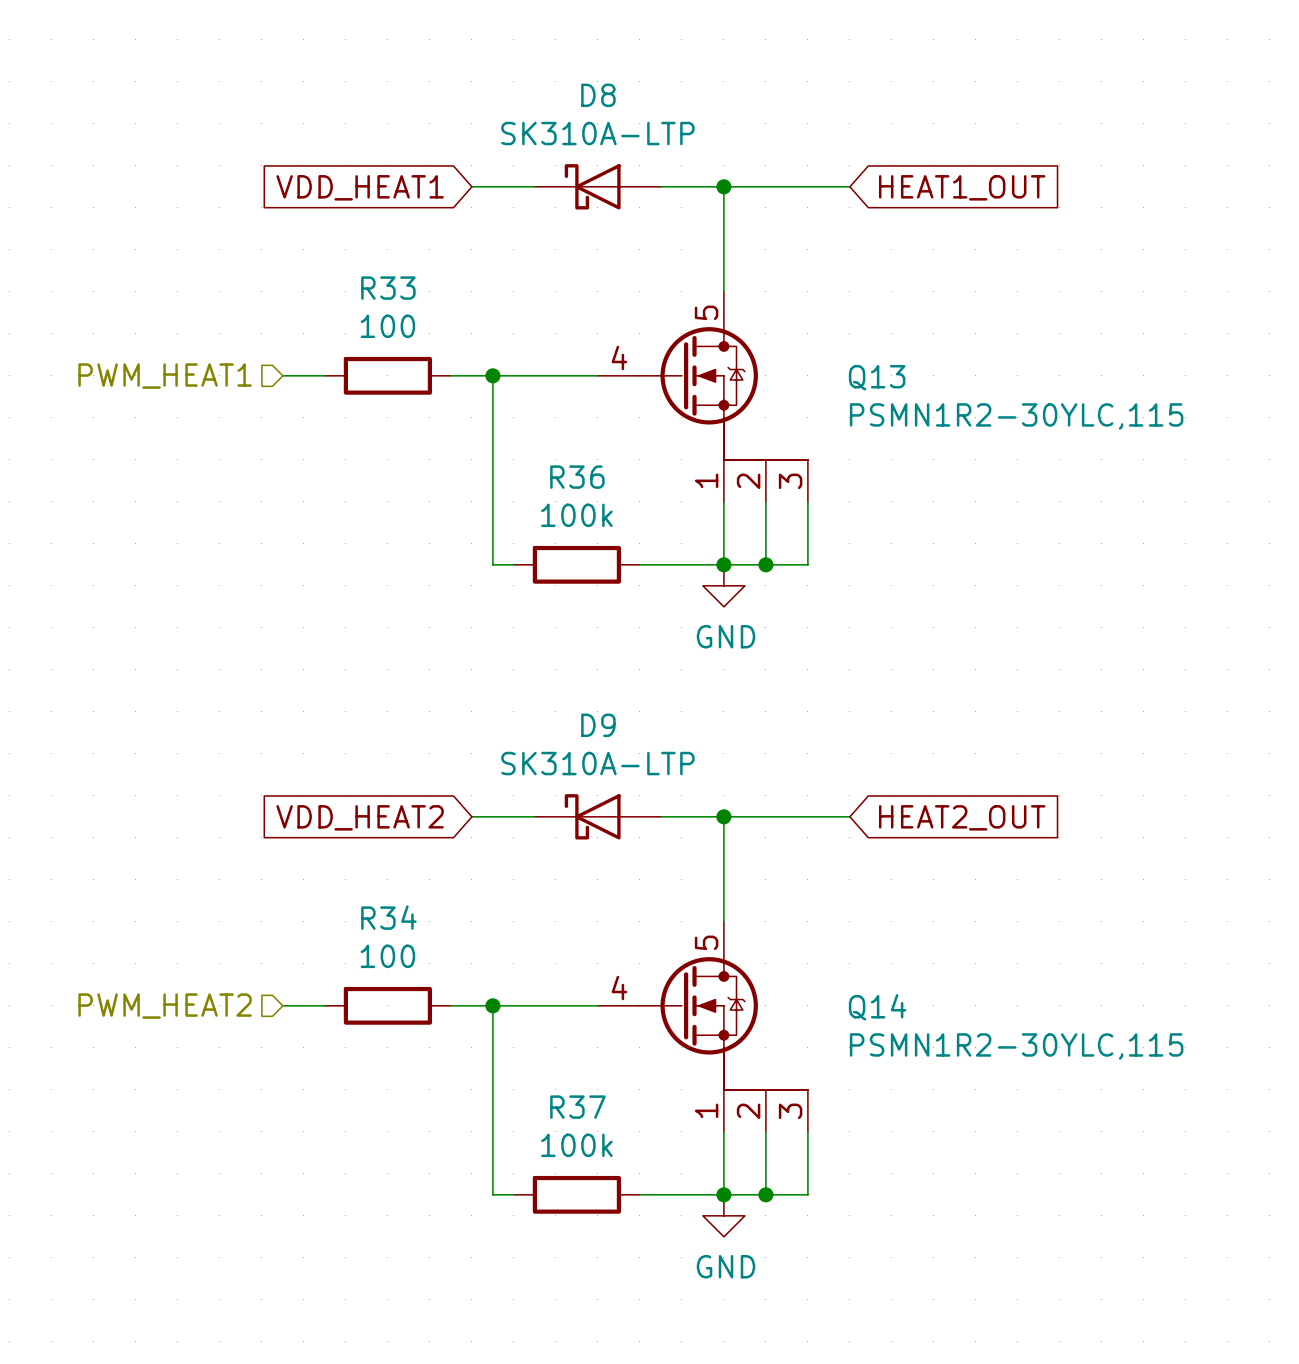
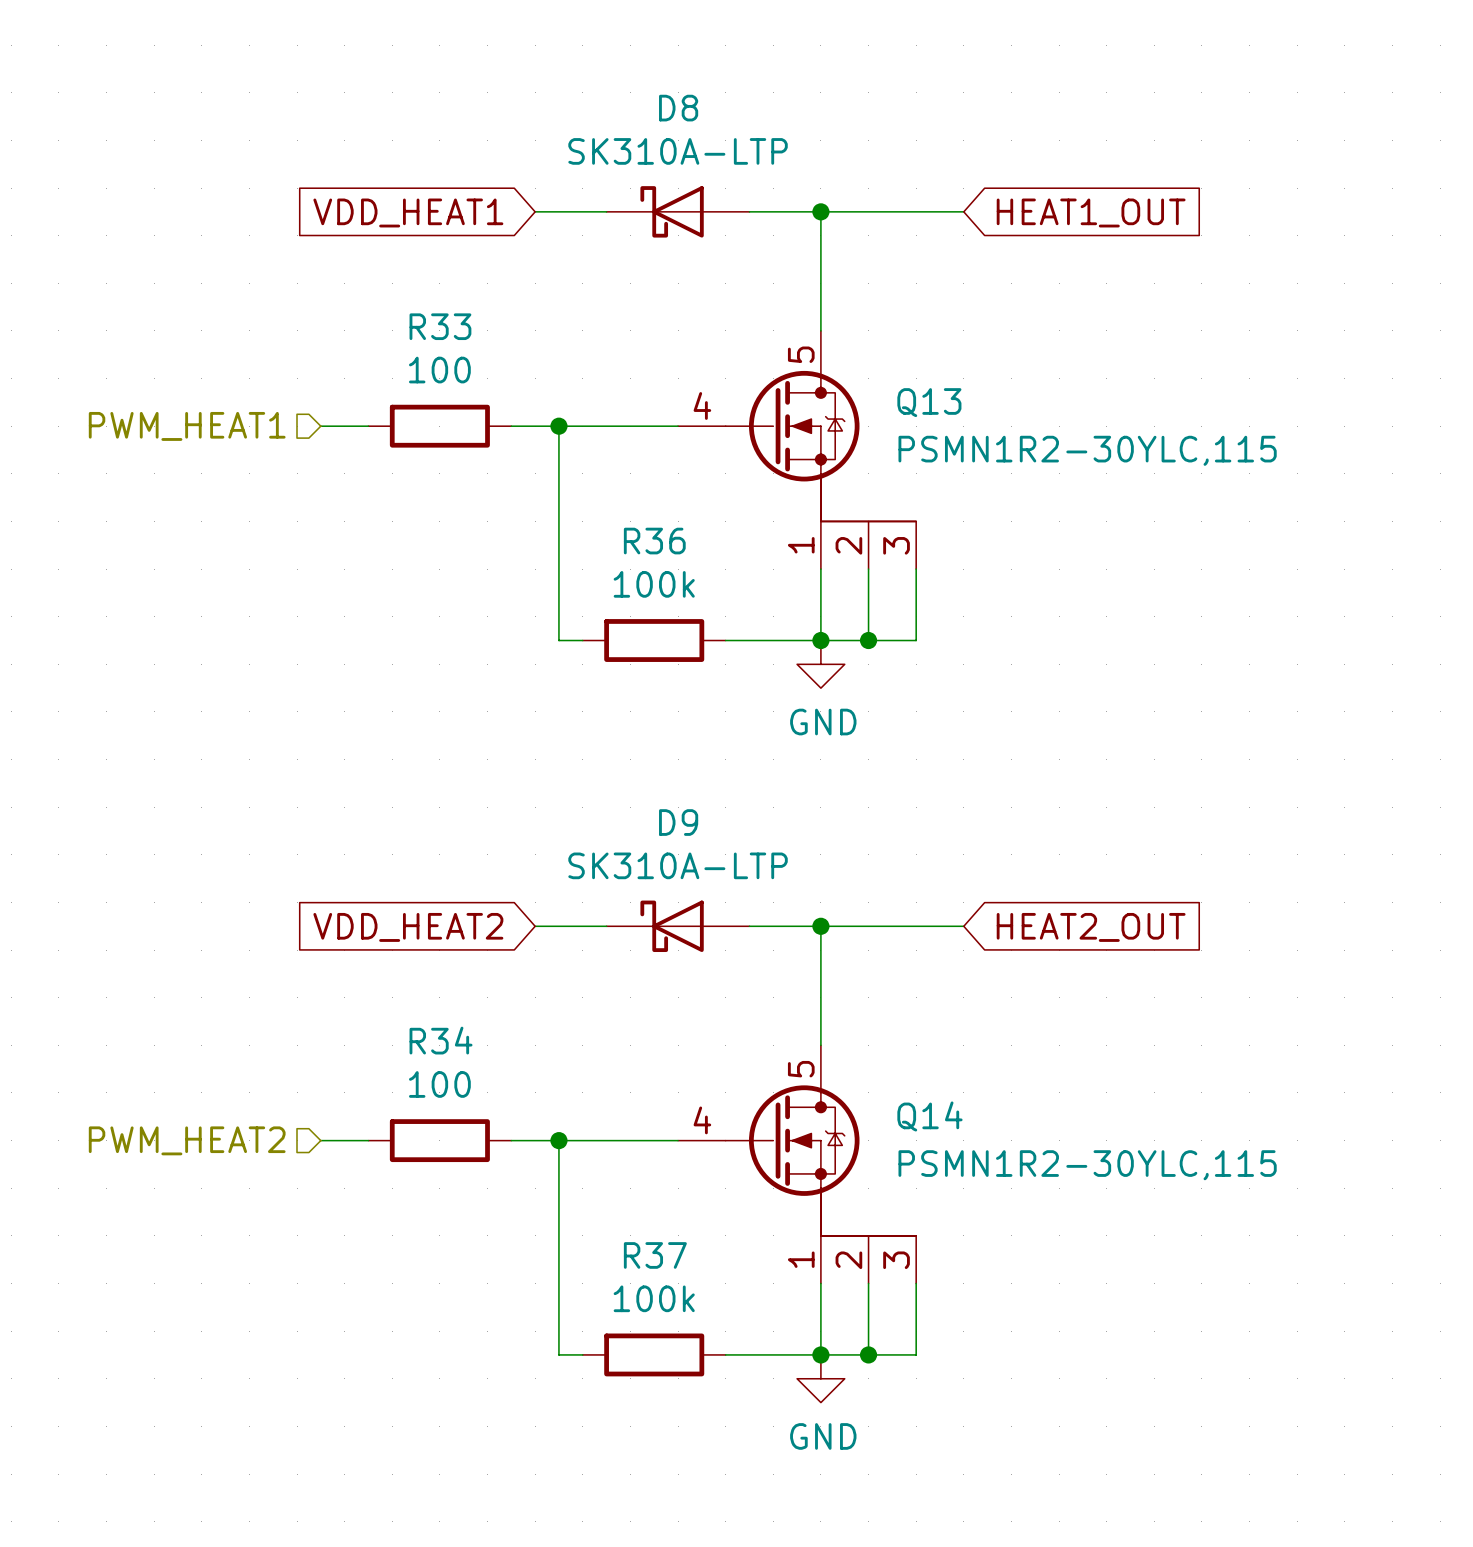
Q13 name position: Q13 (877, 377) -> Q13 (929, 402)
Q13 value position: PSMN1R2-30YLC,115 (1016, 416) -> PSMN1R2-30YLC,115 (1087, 450)
Q14 name position: Q14 (877, 1007) -> Q14 (929, 1116)
Q14 value position: PSMN1R2-30YLC,115 (1016, 1046) -> PSMN1R2-30YLC,115 (1087, 1165)

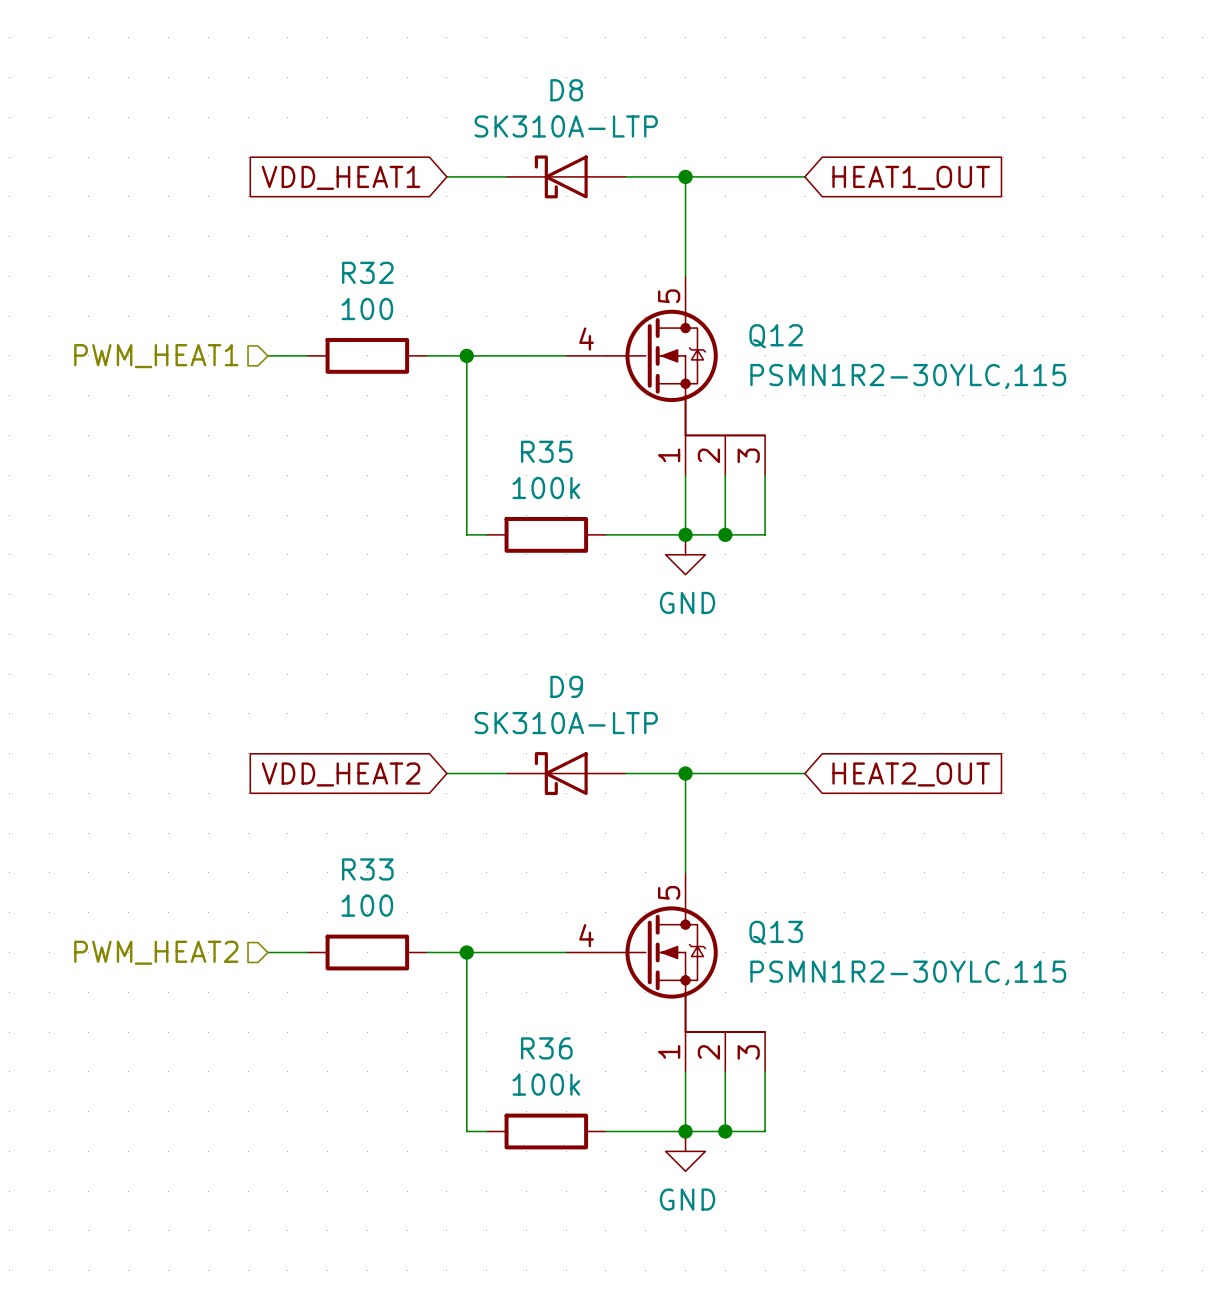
R33 name: R33 (440, 326) -> R32 (367, 272)
Q13 name: Q13 (929, 402) -> Q12 (776, 336)
R36 name: R36 (654, 541) -> R35 (546, 451)
R34 name: R34 (441, 1040) -> R33 (367, 869)
Q14 name: Q14 (929, 1116) -> Q13 (776, 932)
R37 name: R37 (655, 1255) -> R36 (546, 1048)

